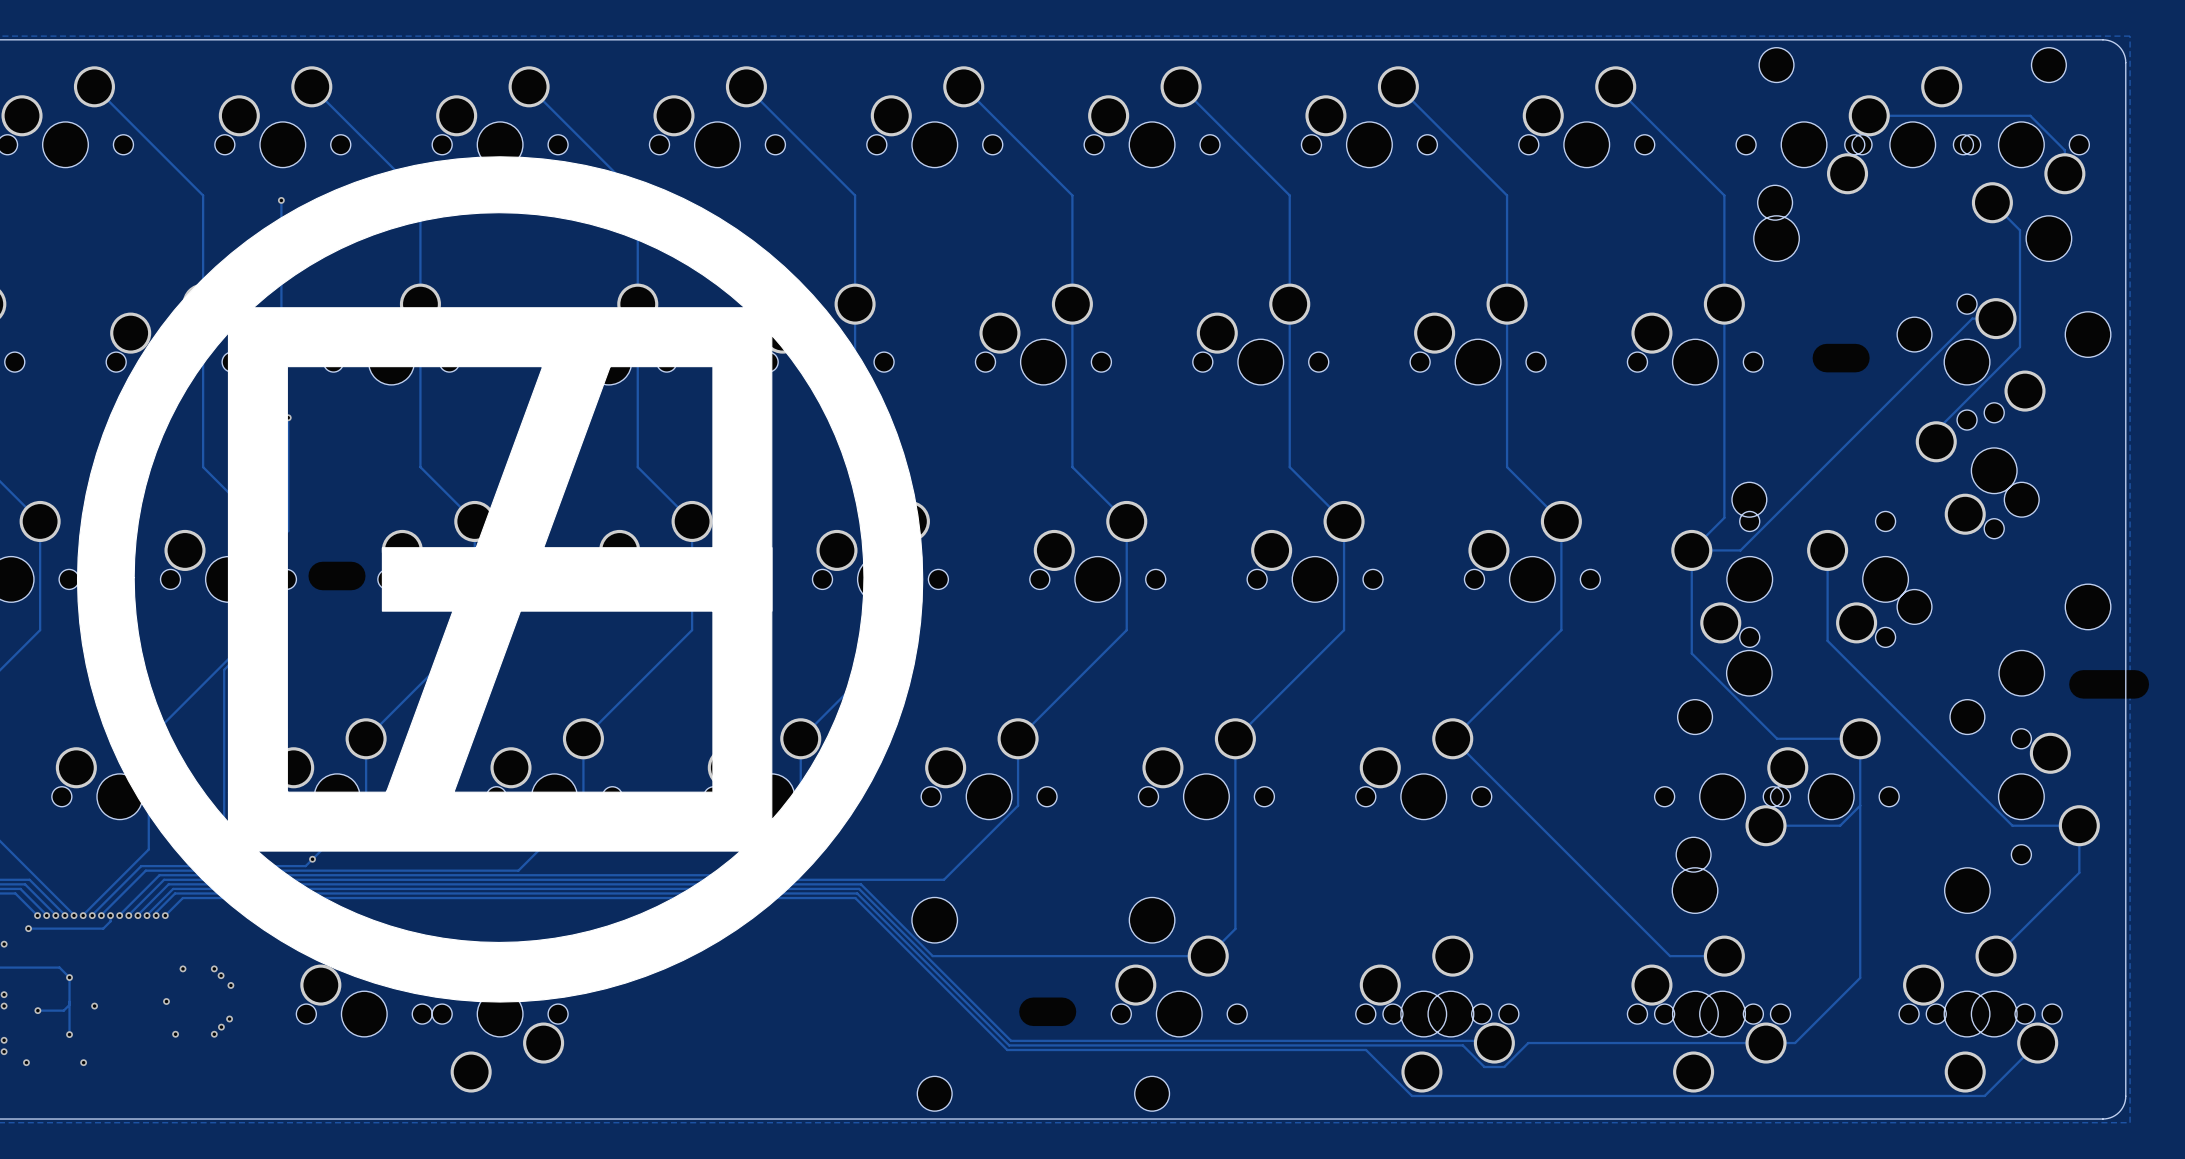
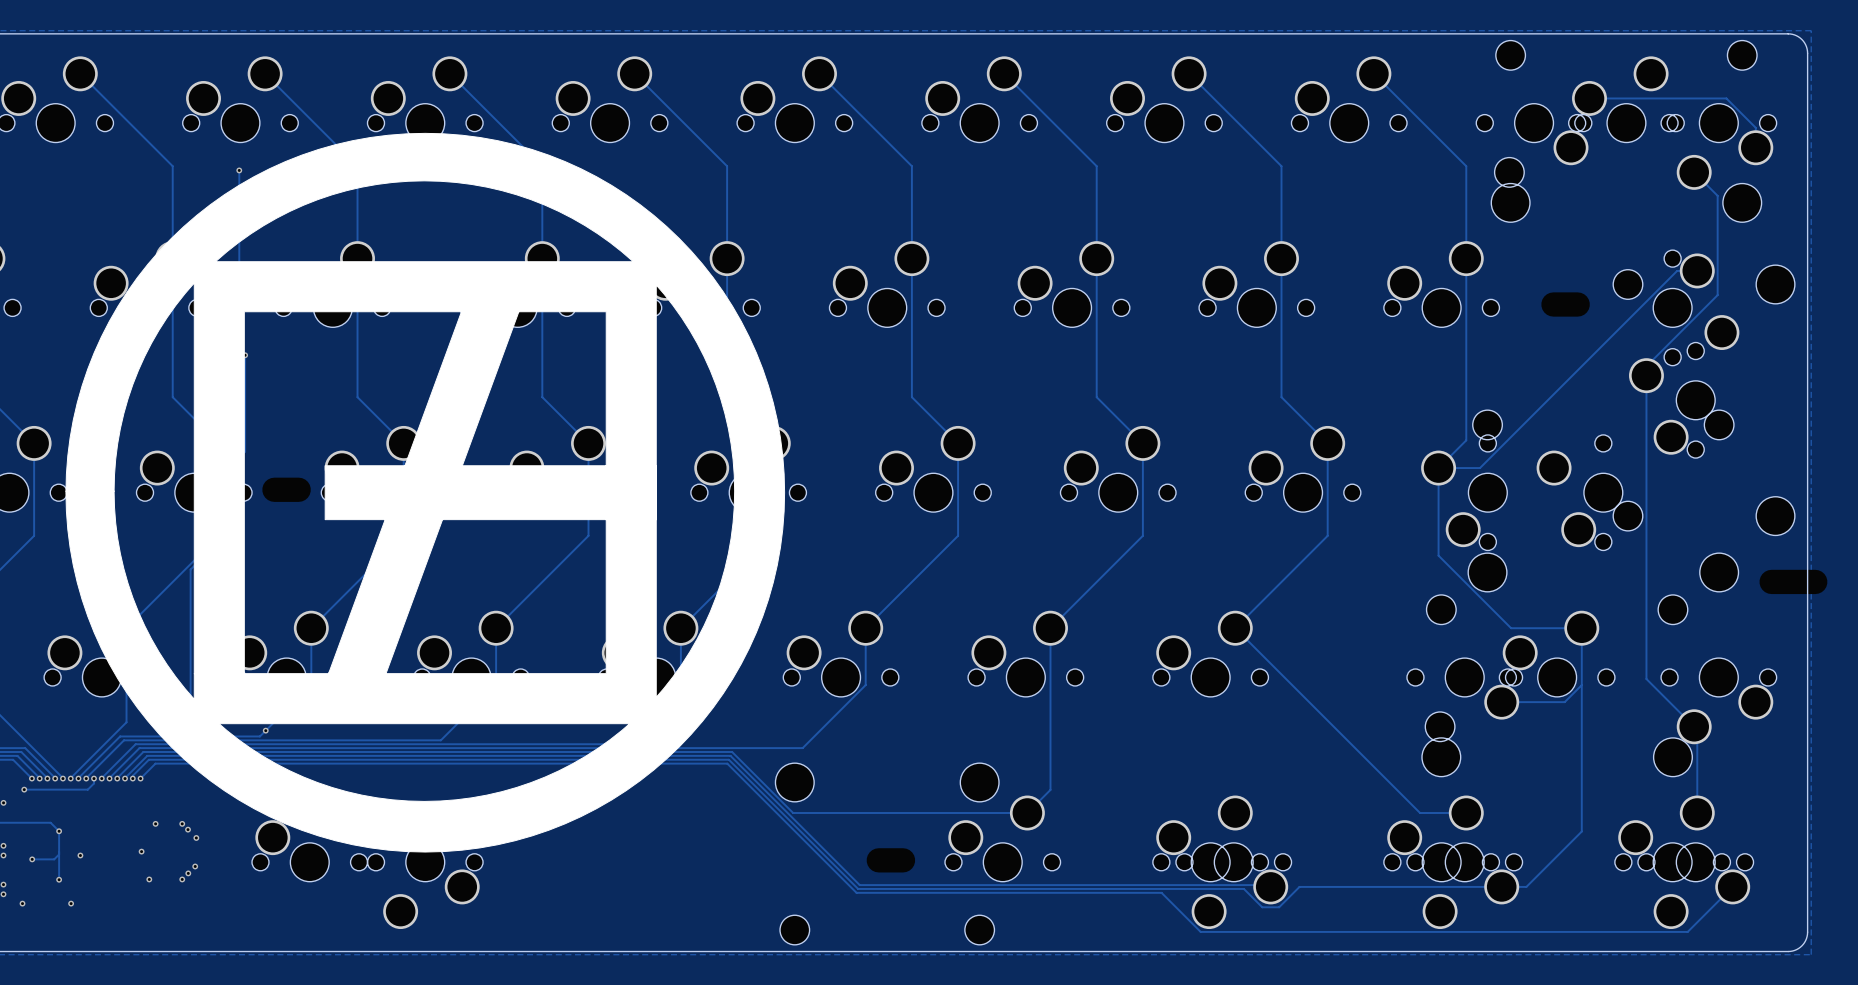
track: (1827, 550) (1827, 640) (2012, 825) (2079, 825) (2079, 872) (1996, 956) -> (1646, 375) (1646, 679) (1697, 729) (1697, 813)
part rotation: 0° (2049, 796) -> 90° clockwise (1718, 701)

